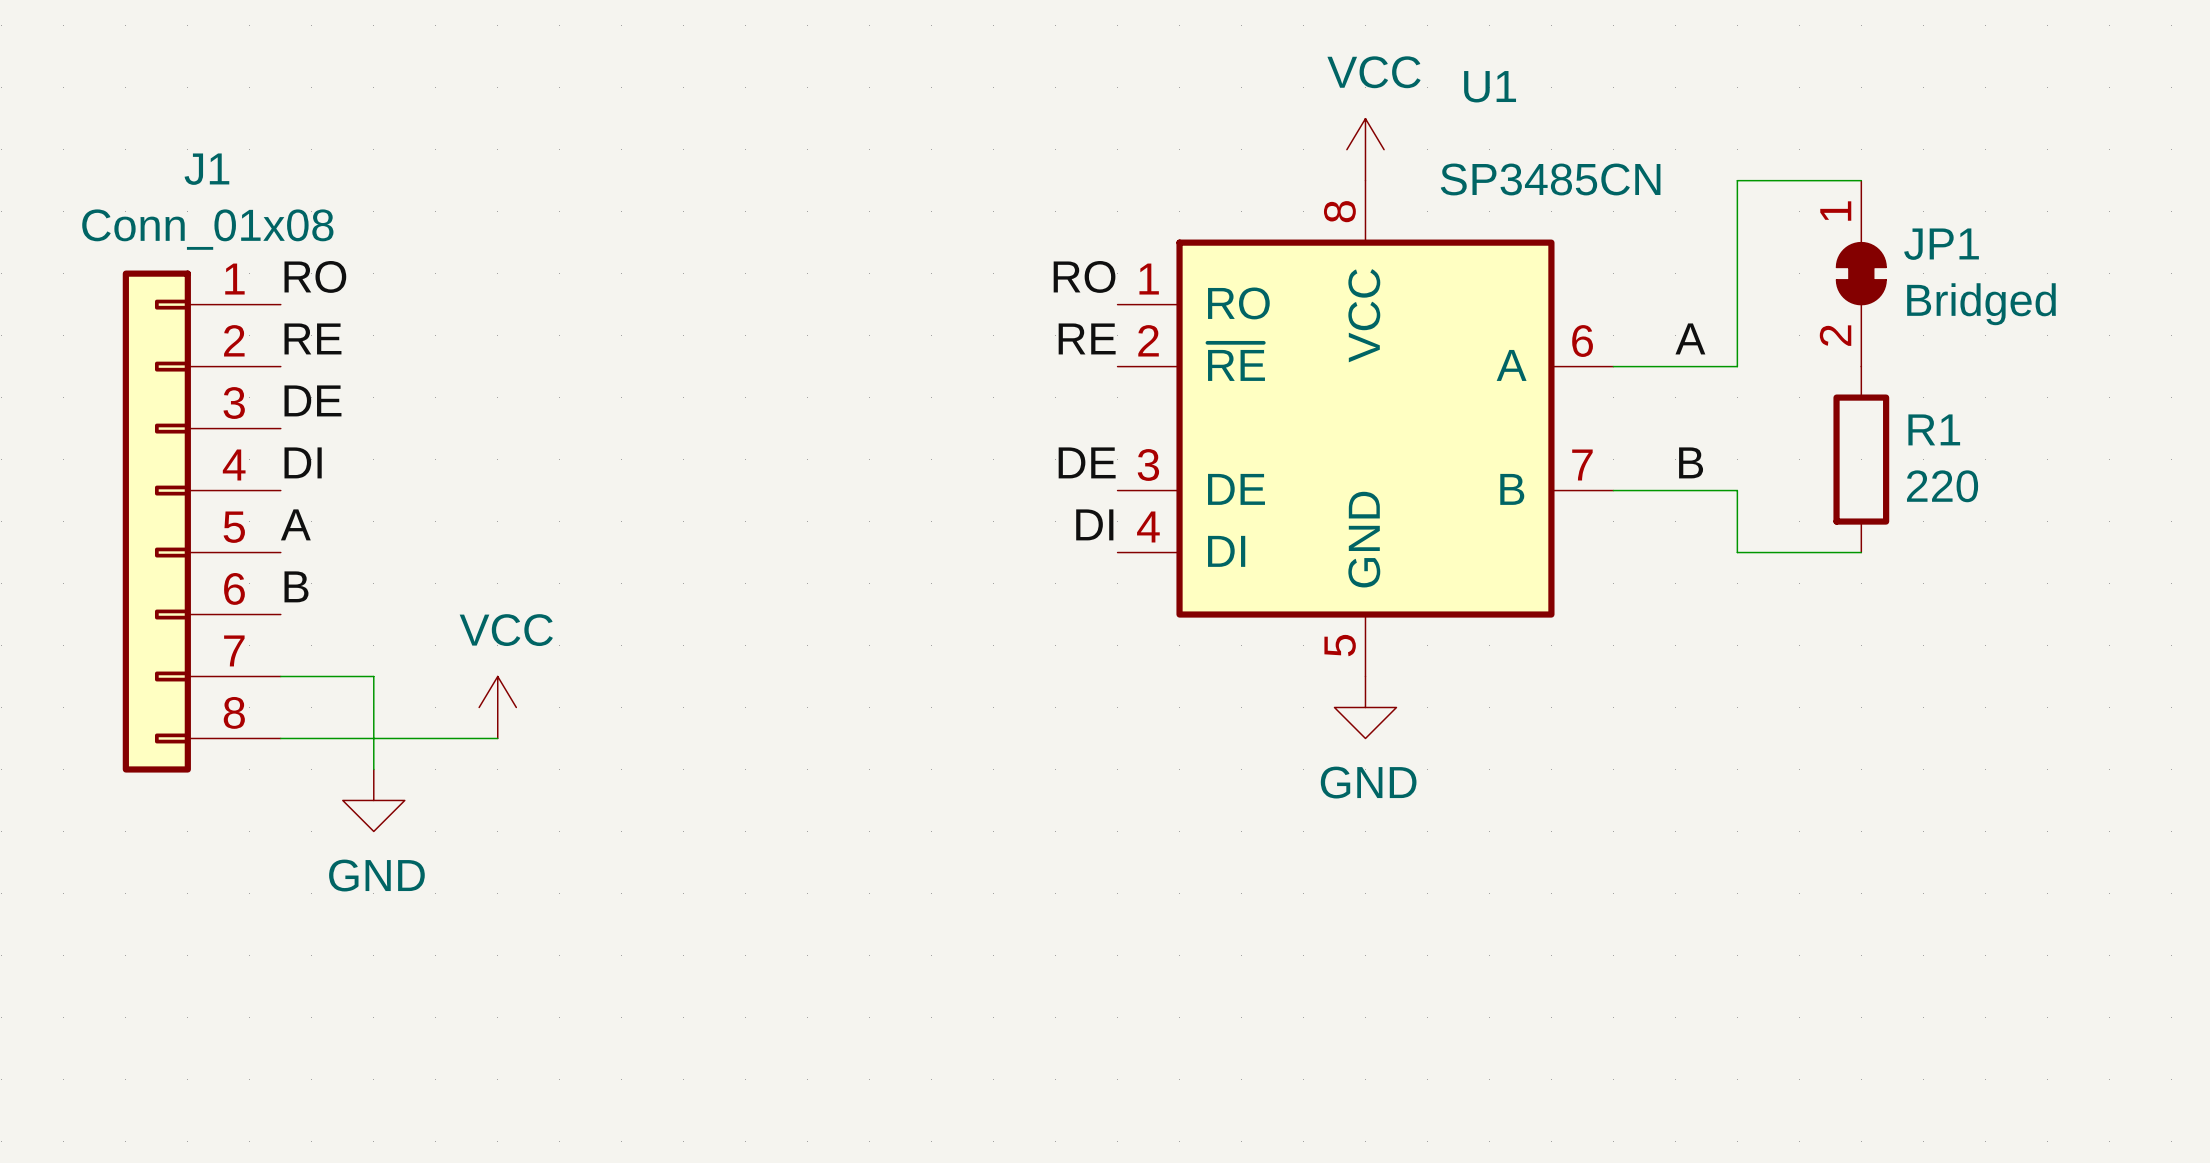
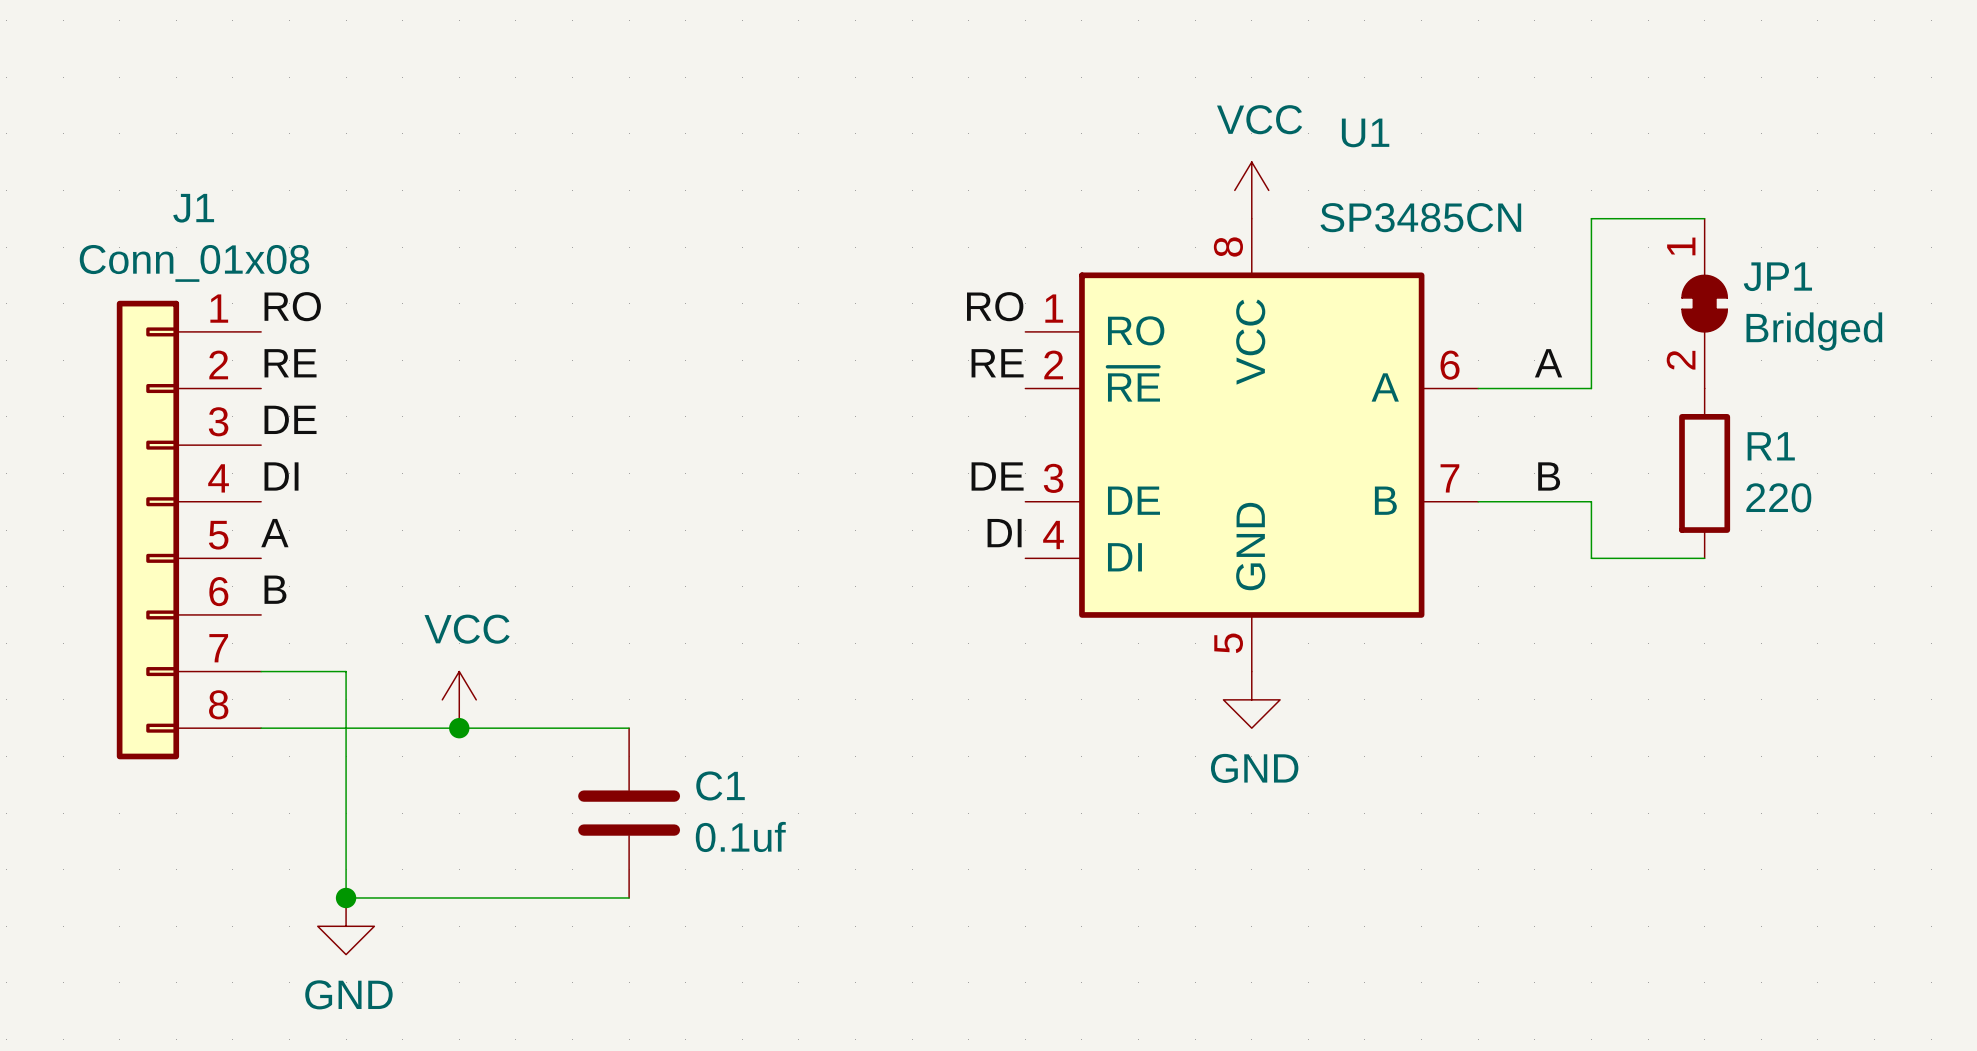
wire: none -> (459, 728) (629, 728)
junction: none -> (459, 728)
wire: none -> (346, 756) (346, 897) (629, 897)
power symbol position: GND (373, 800) -> GND (346, 926)
C1: none -> 0.1uf (629, 813)
junction: none -> (346, 897)

